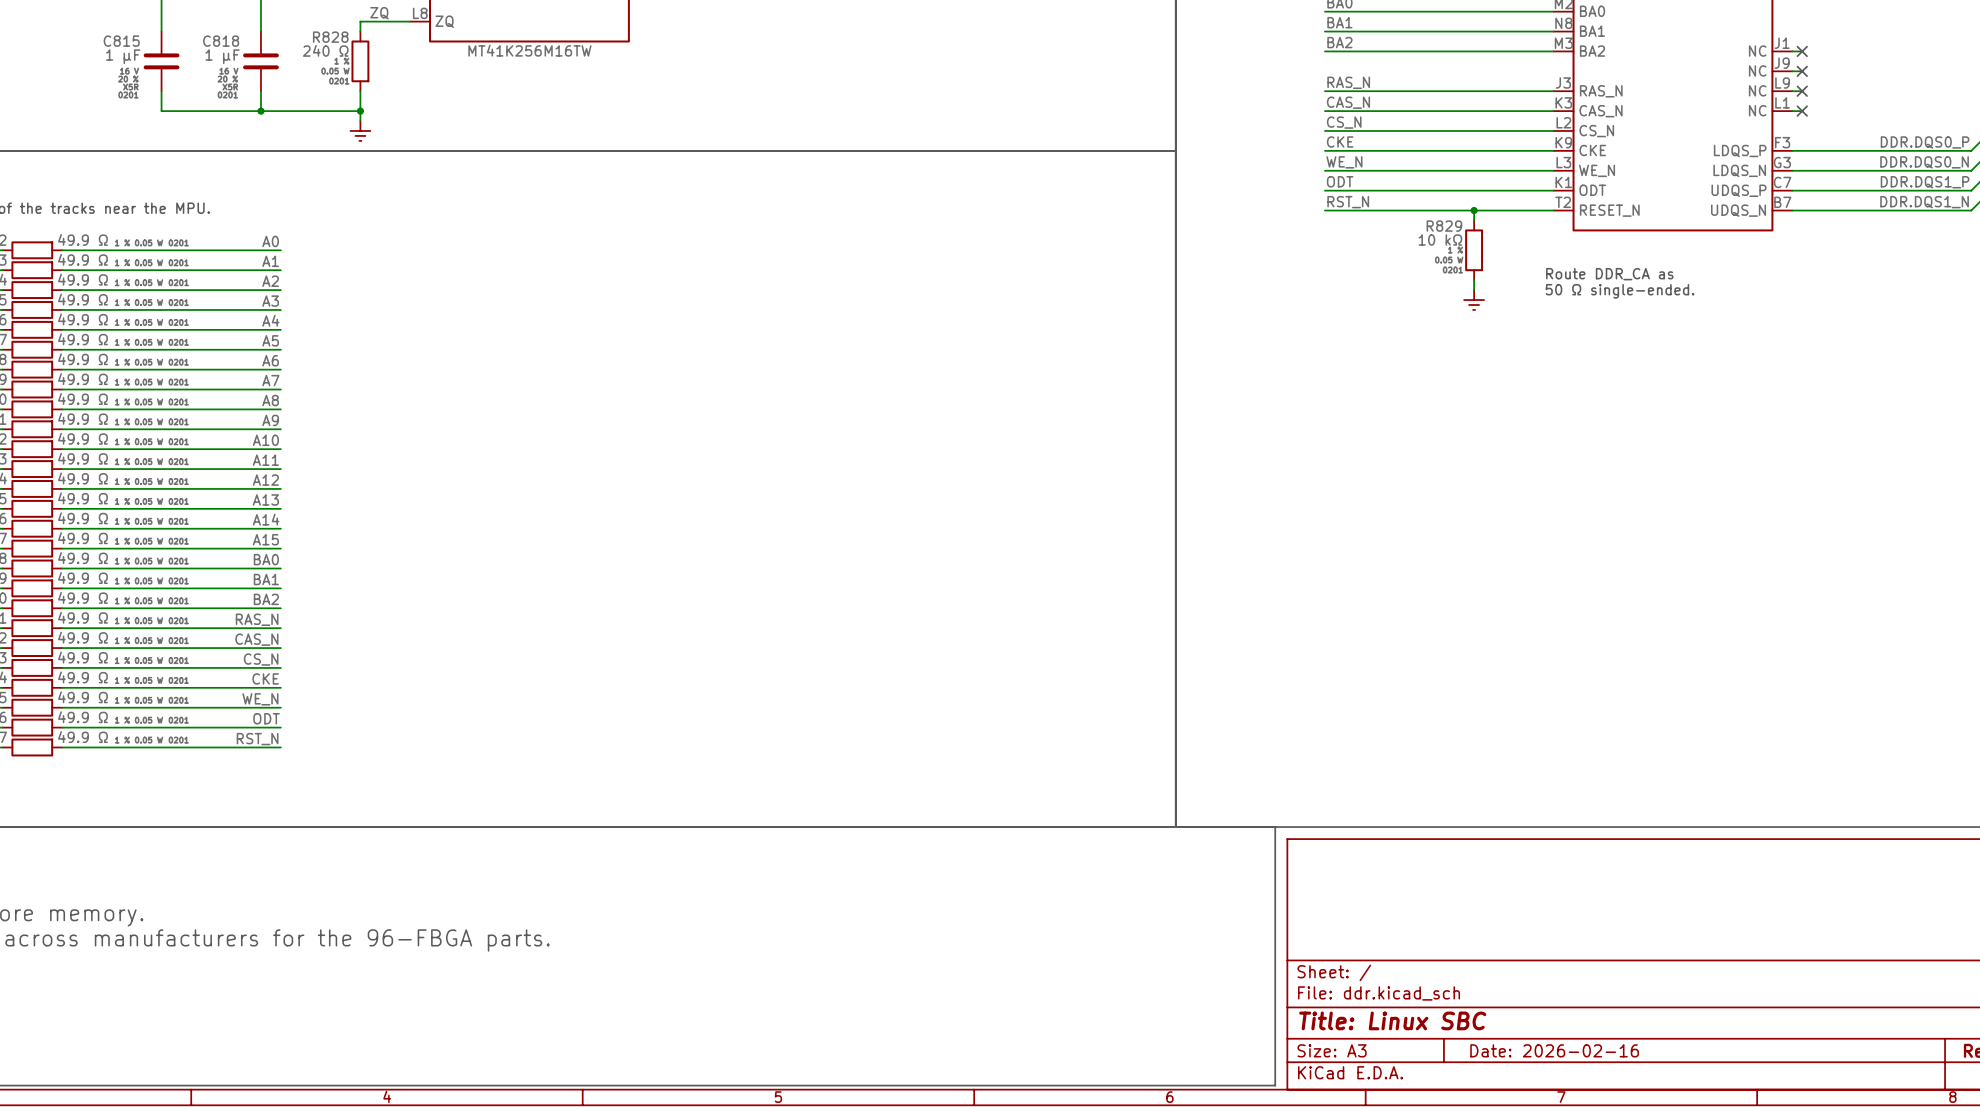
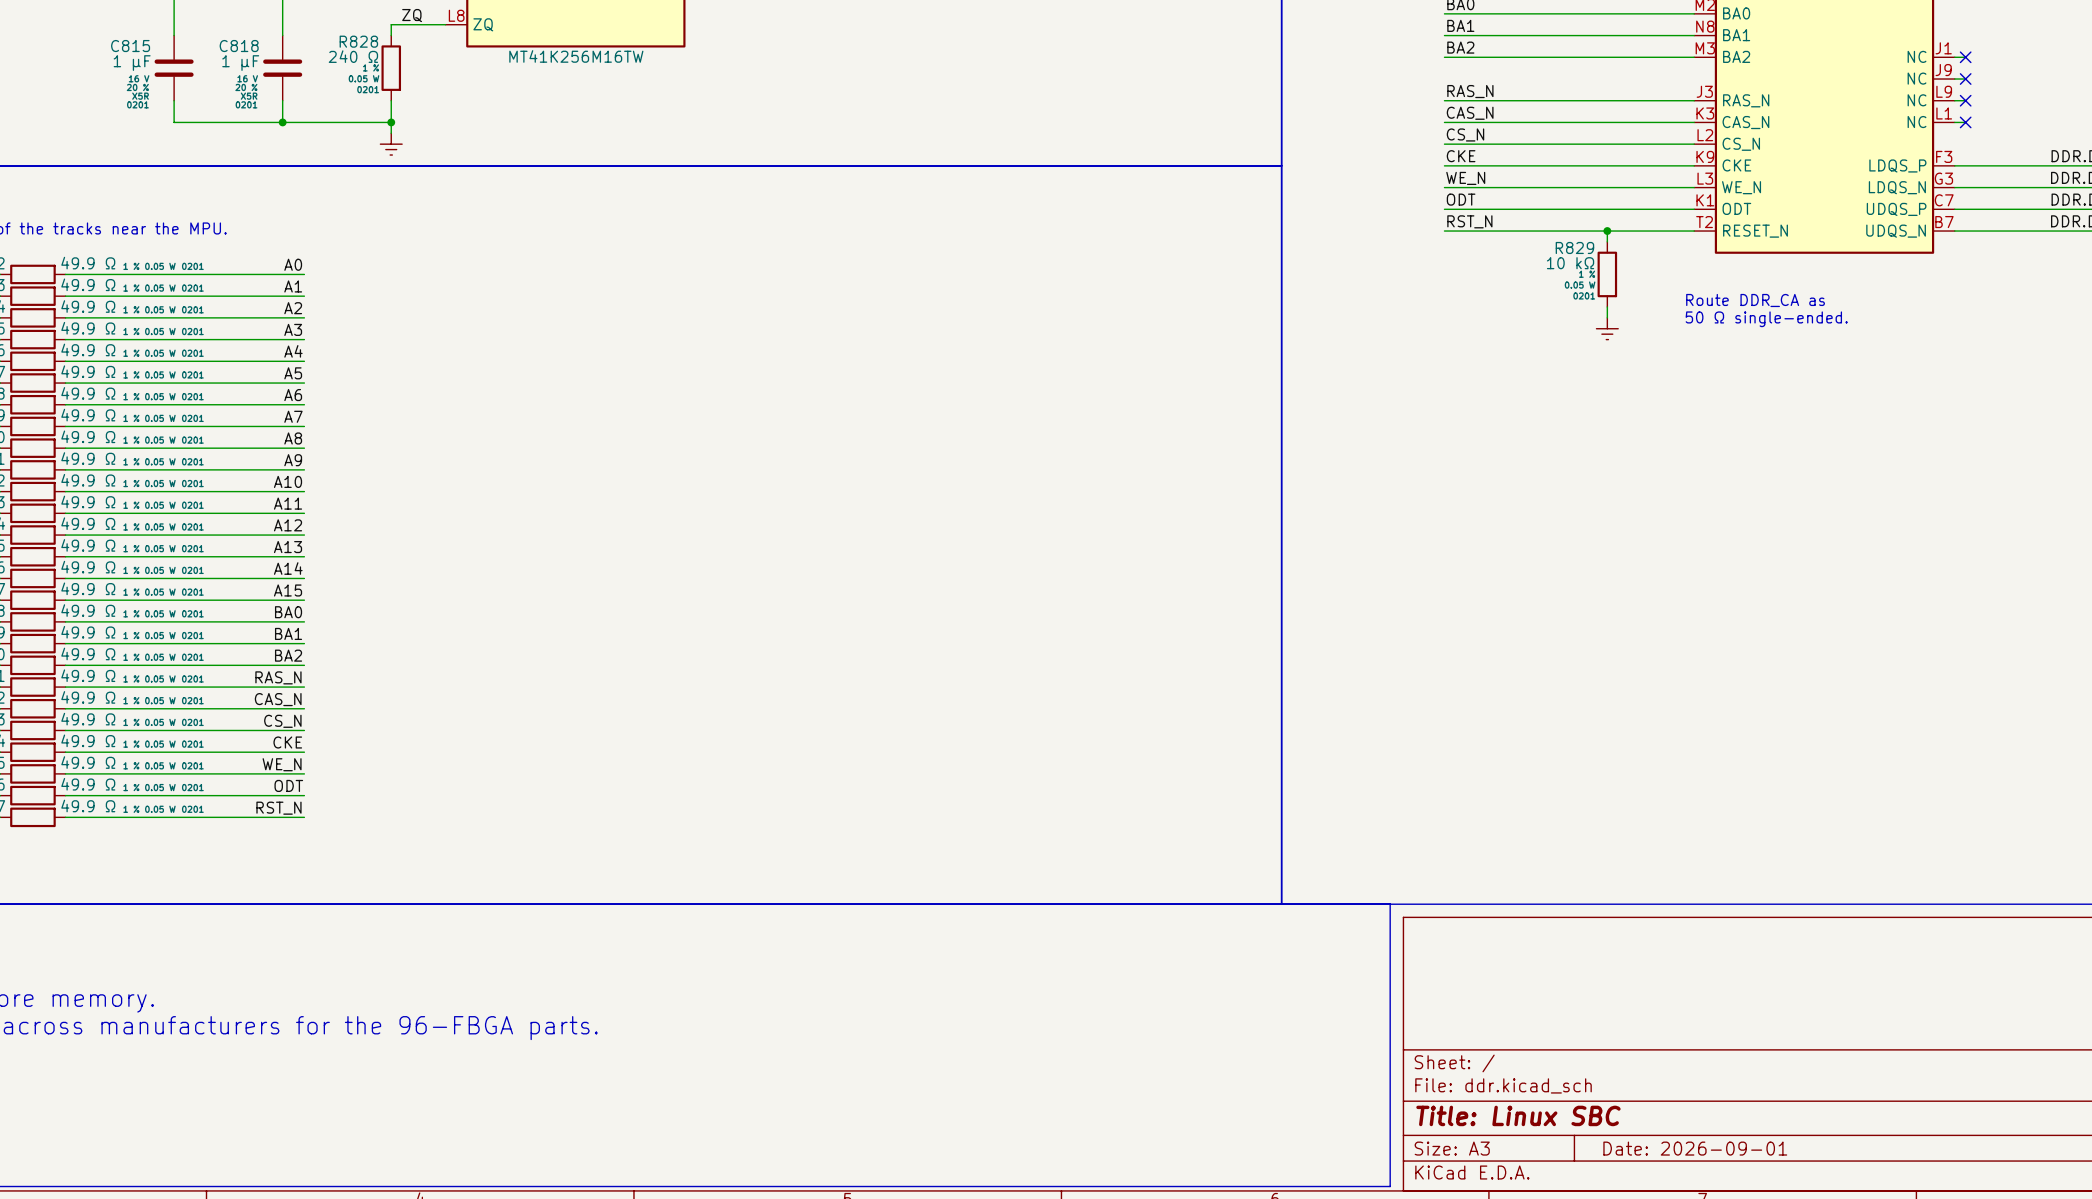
title block: Date: 2026-02-16 (1554, 1050) -> Date: 2026-09-01 (1695, 1148)

